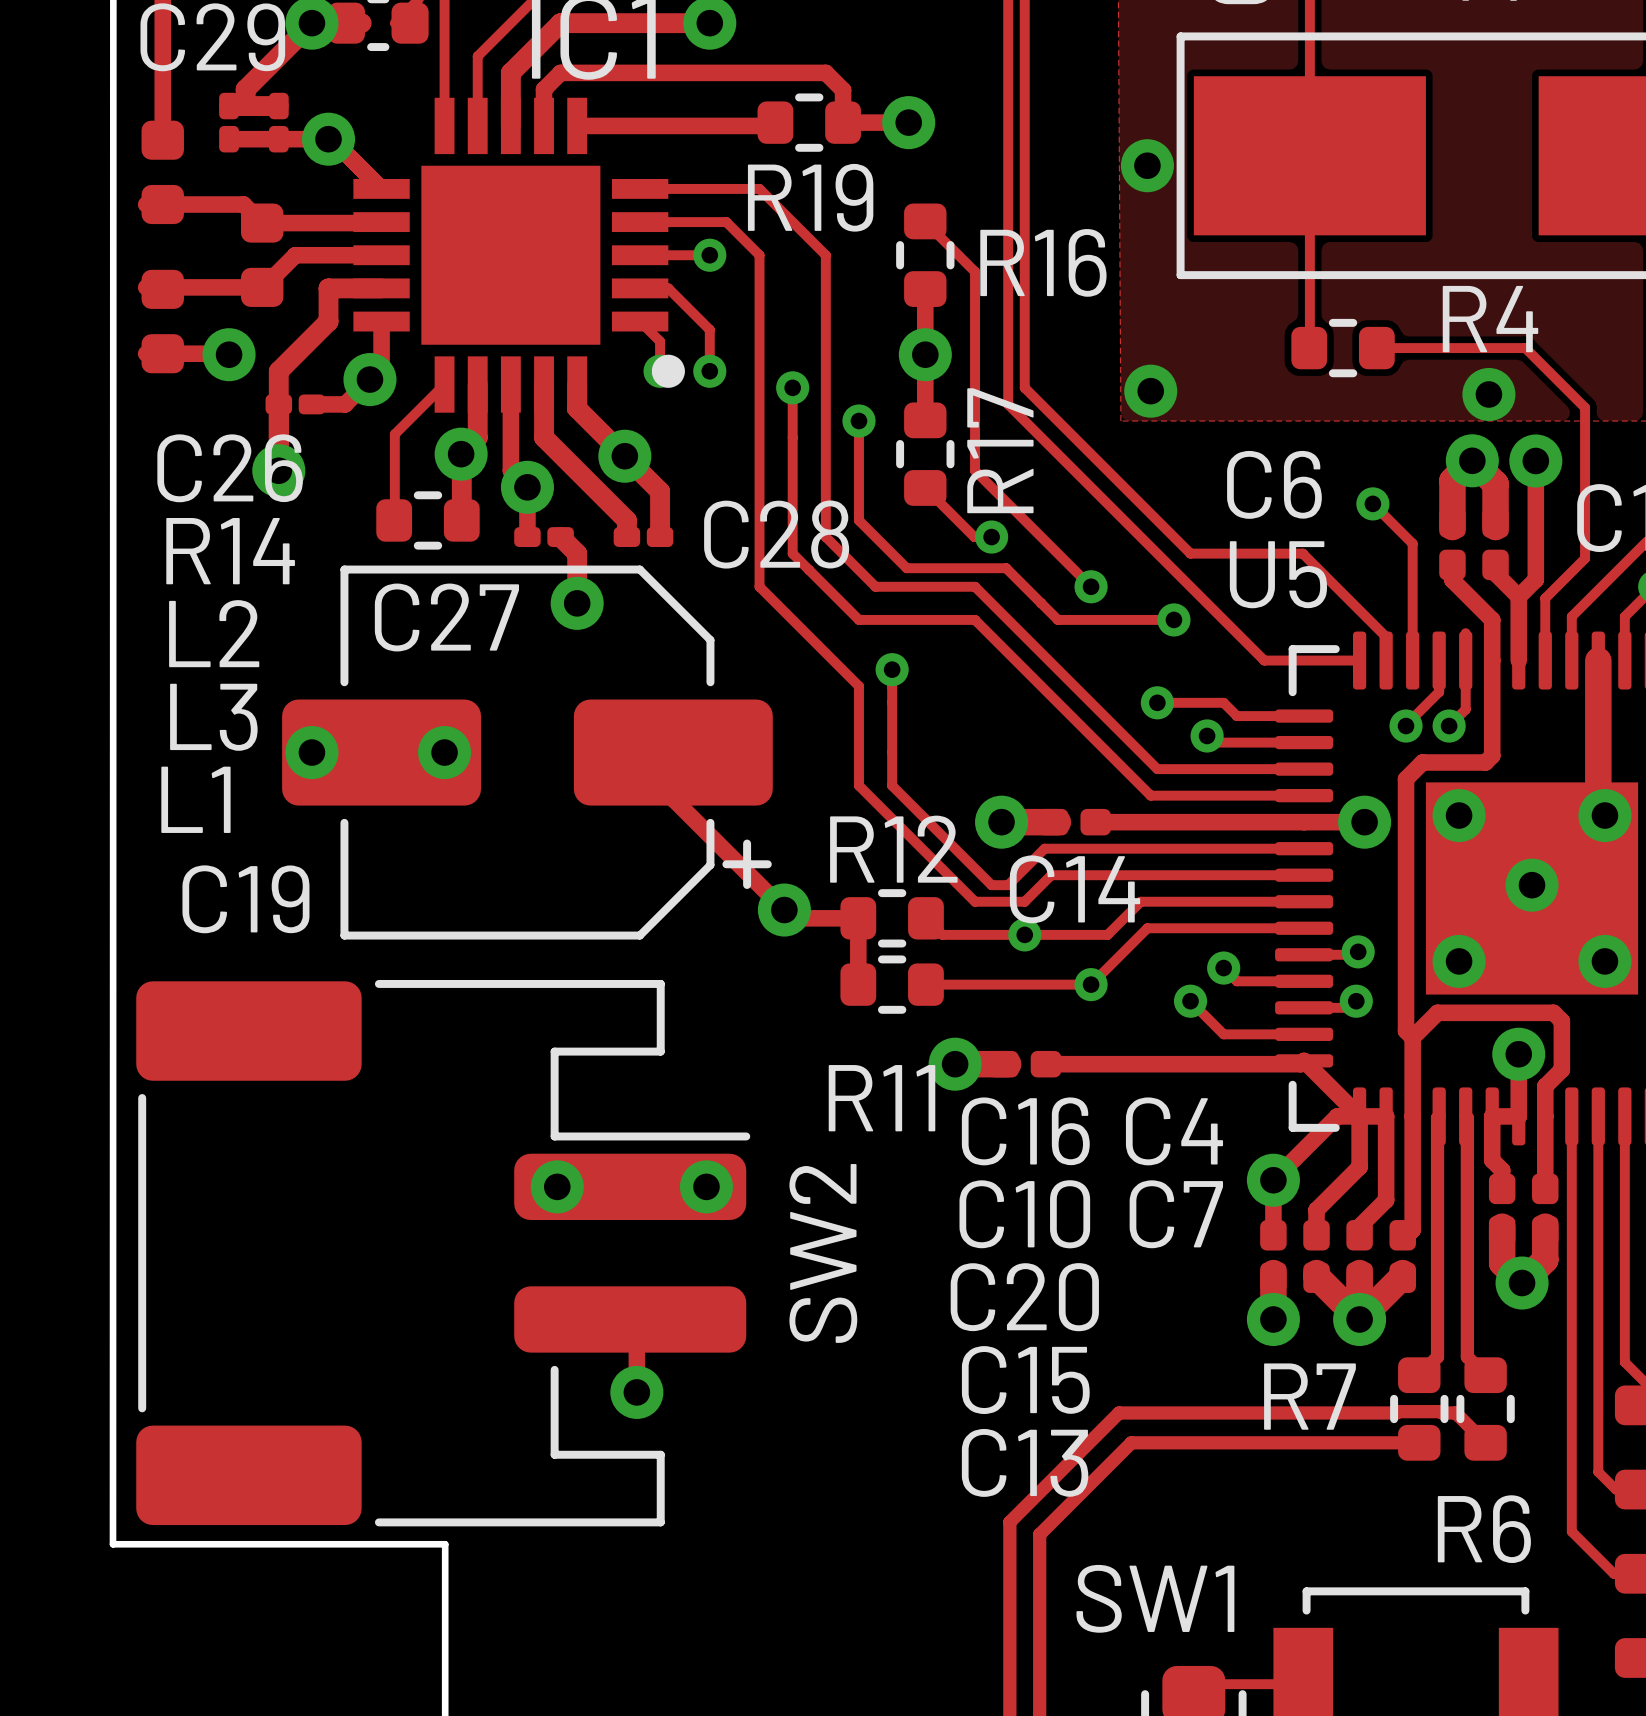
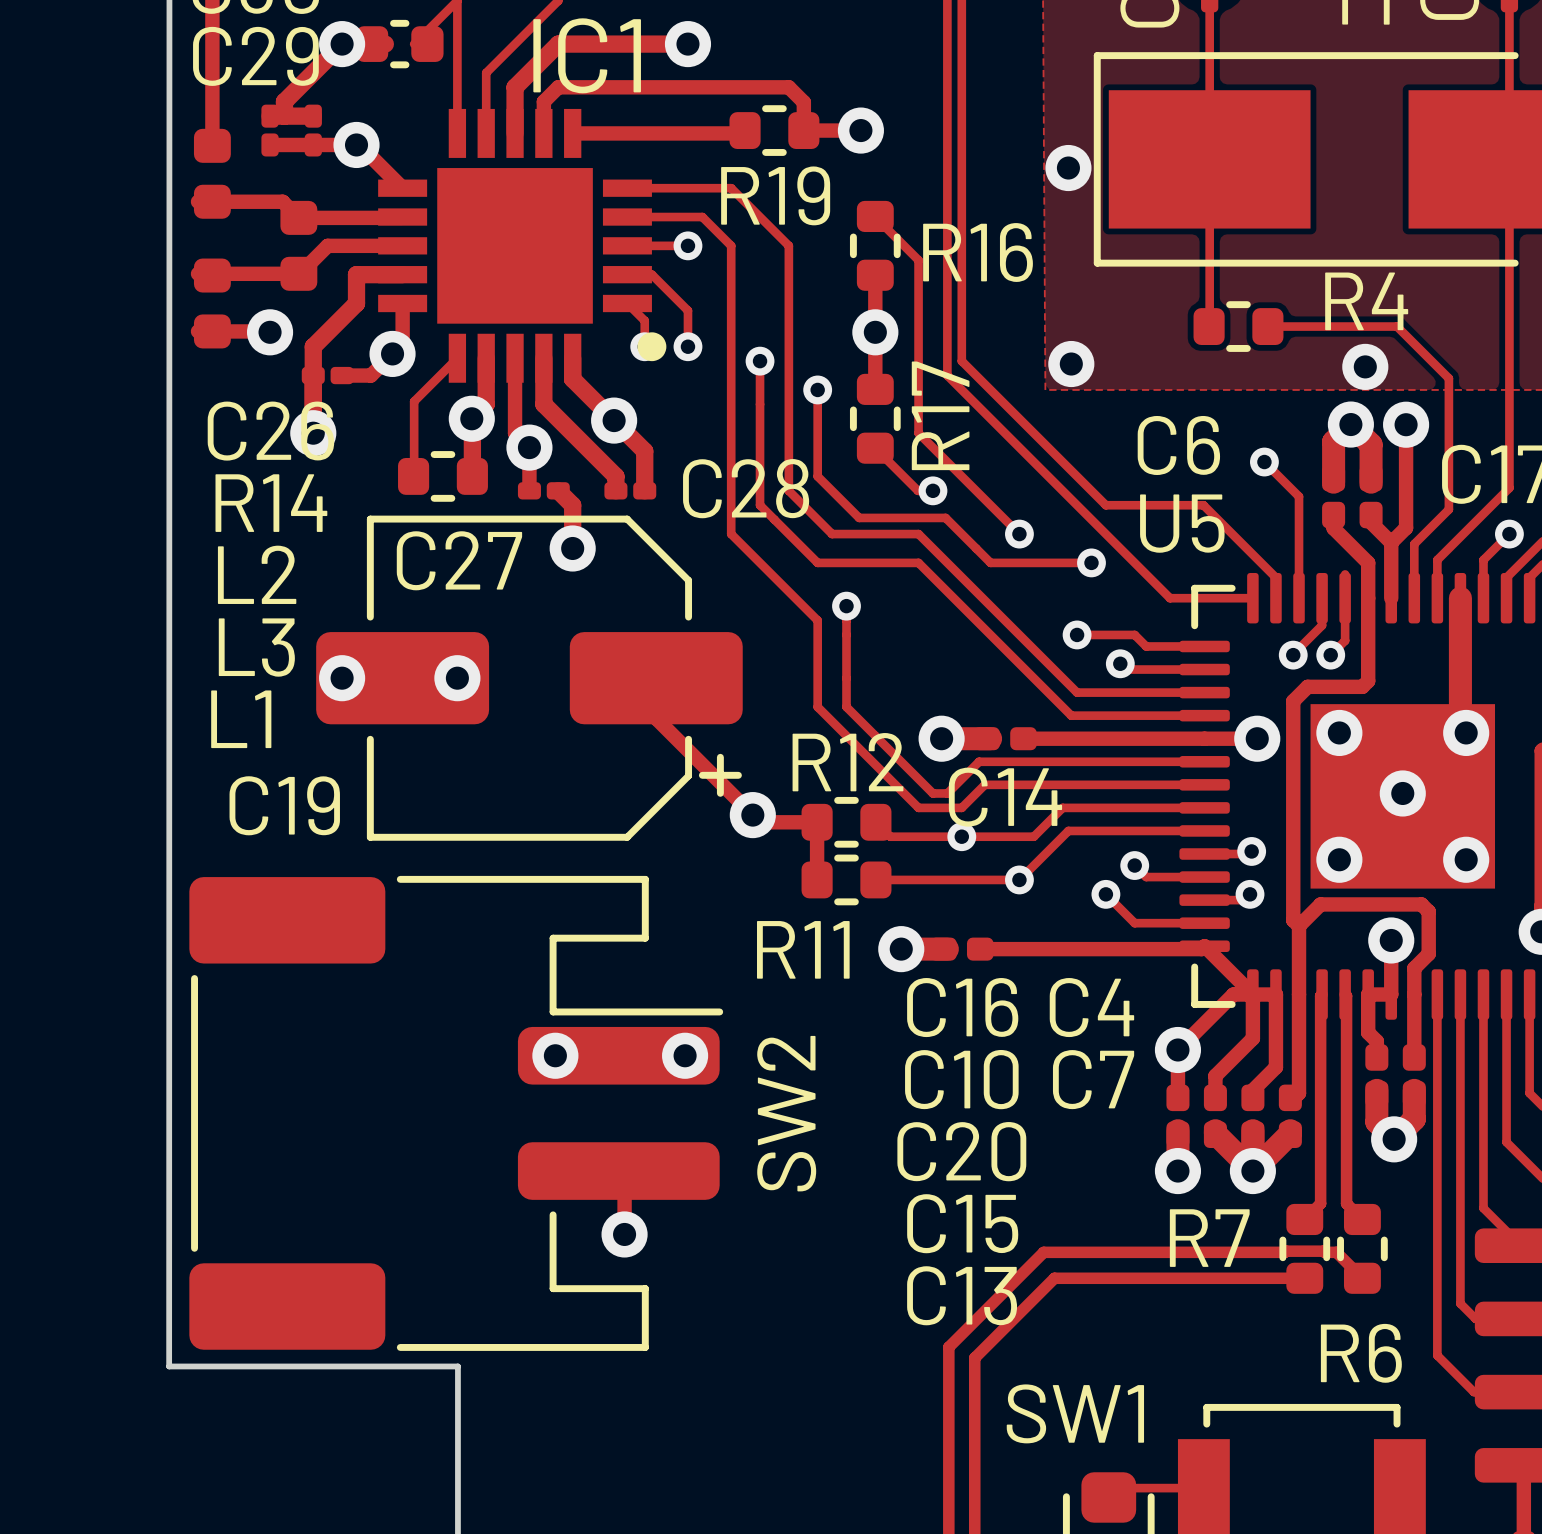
R11 name position: R11 (882, 1098) -> R11 (803, 949)

